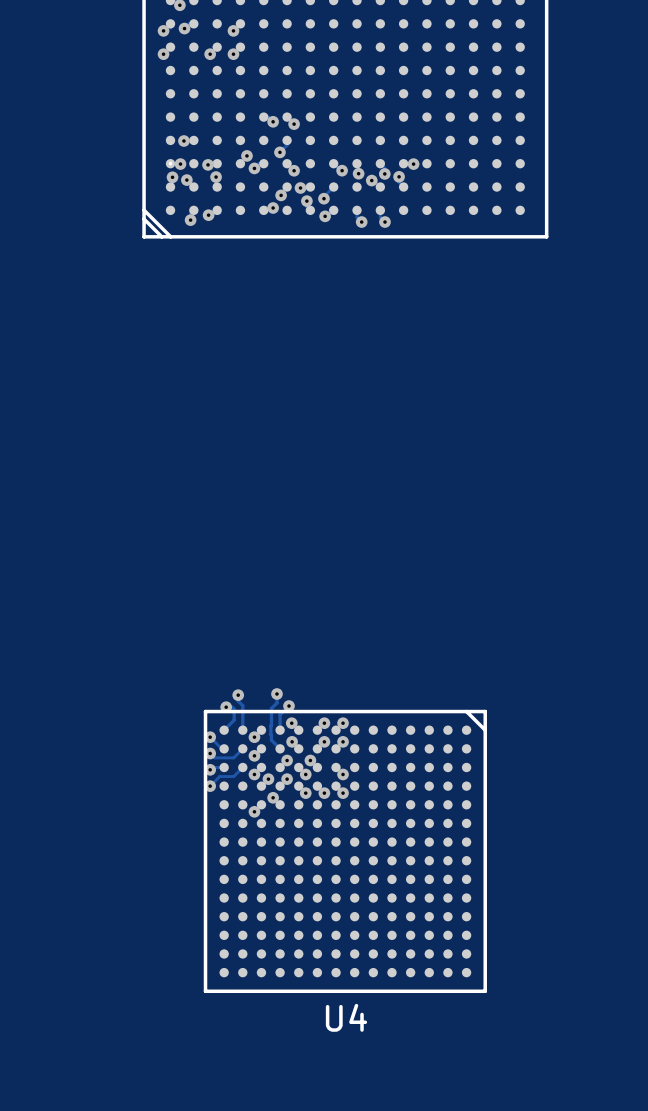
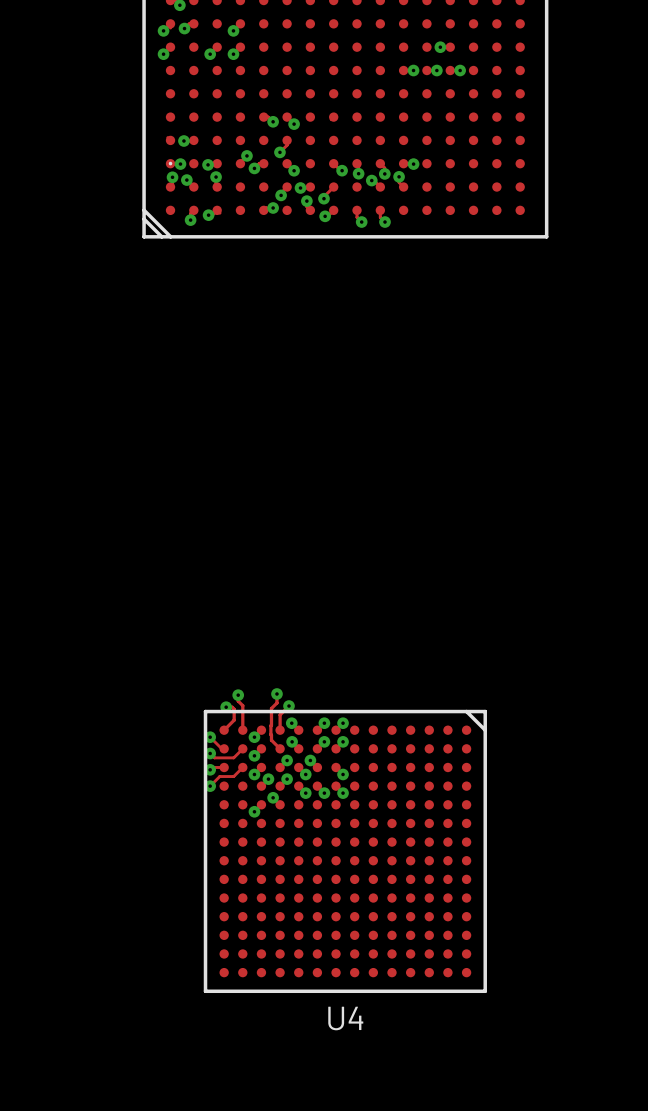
via: none -> (440, 47)
via: none -> (413, 70)
via: none -> (436, 70)
via: none -> (460, 70)

